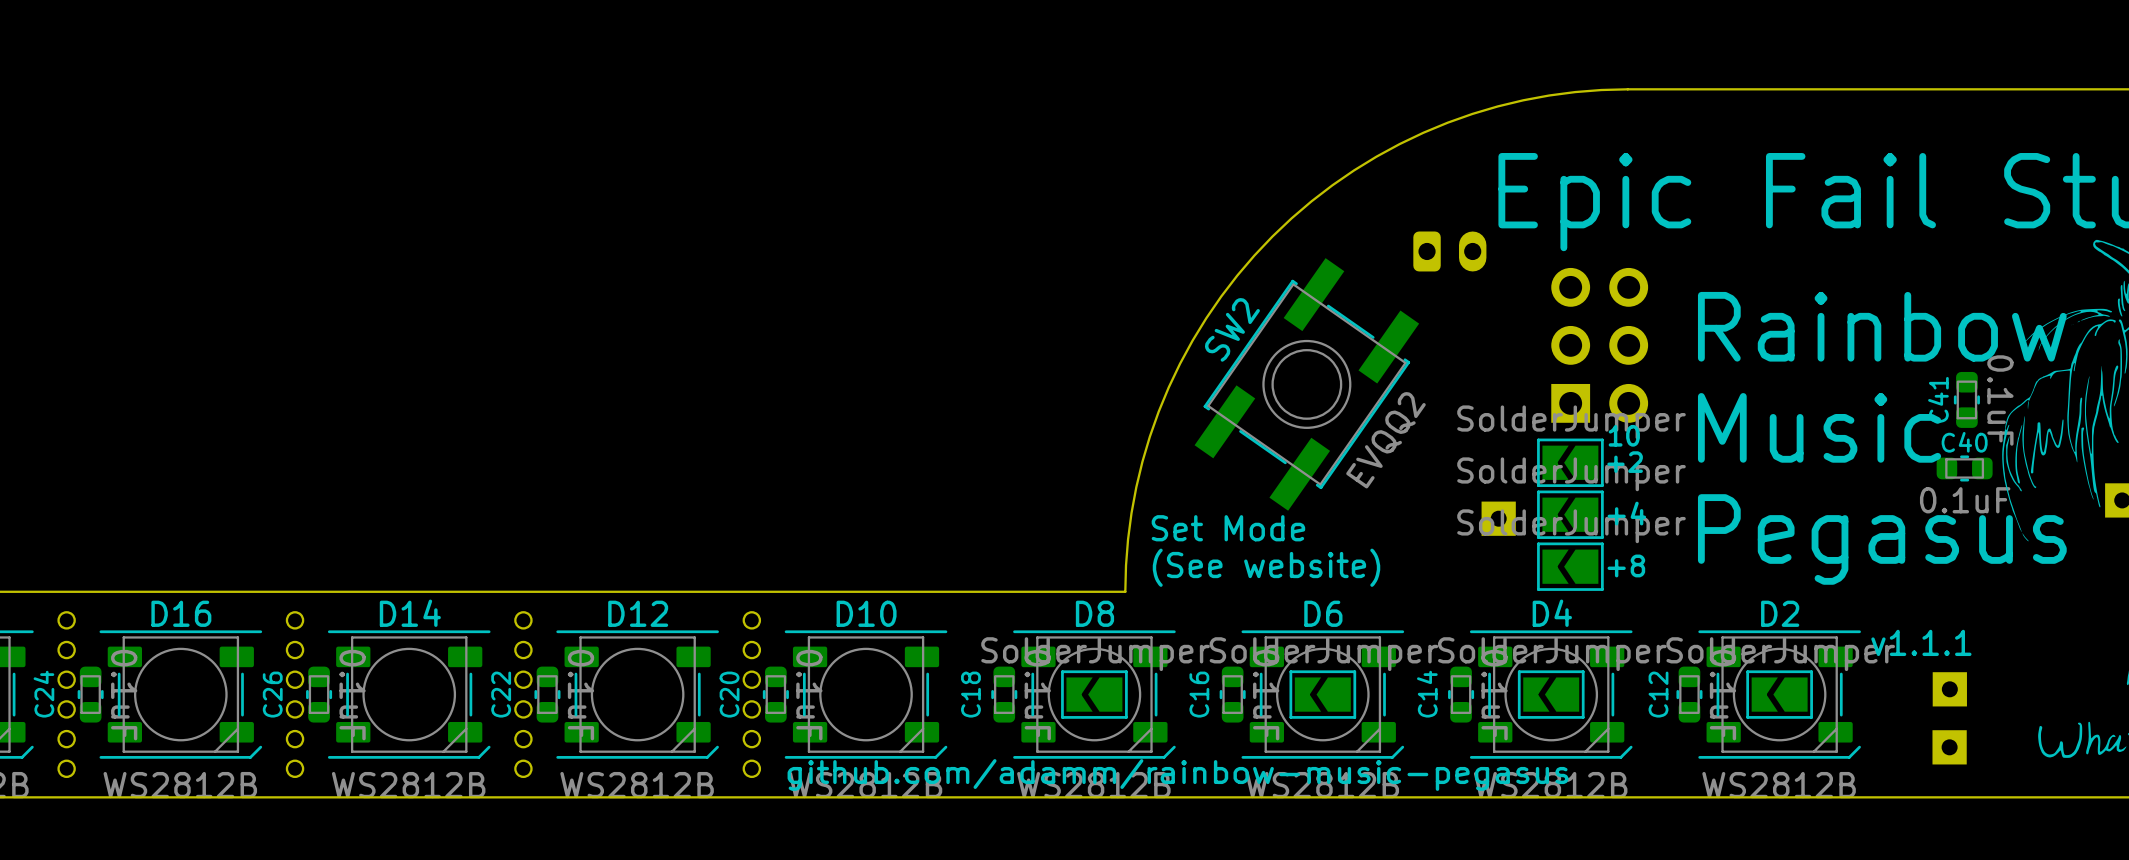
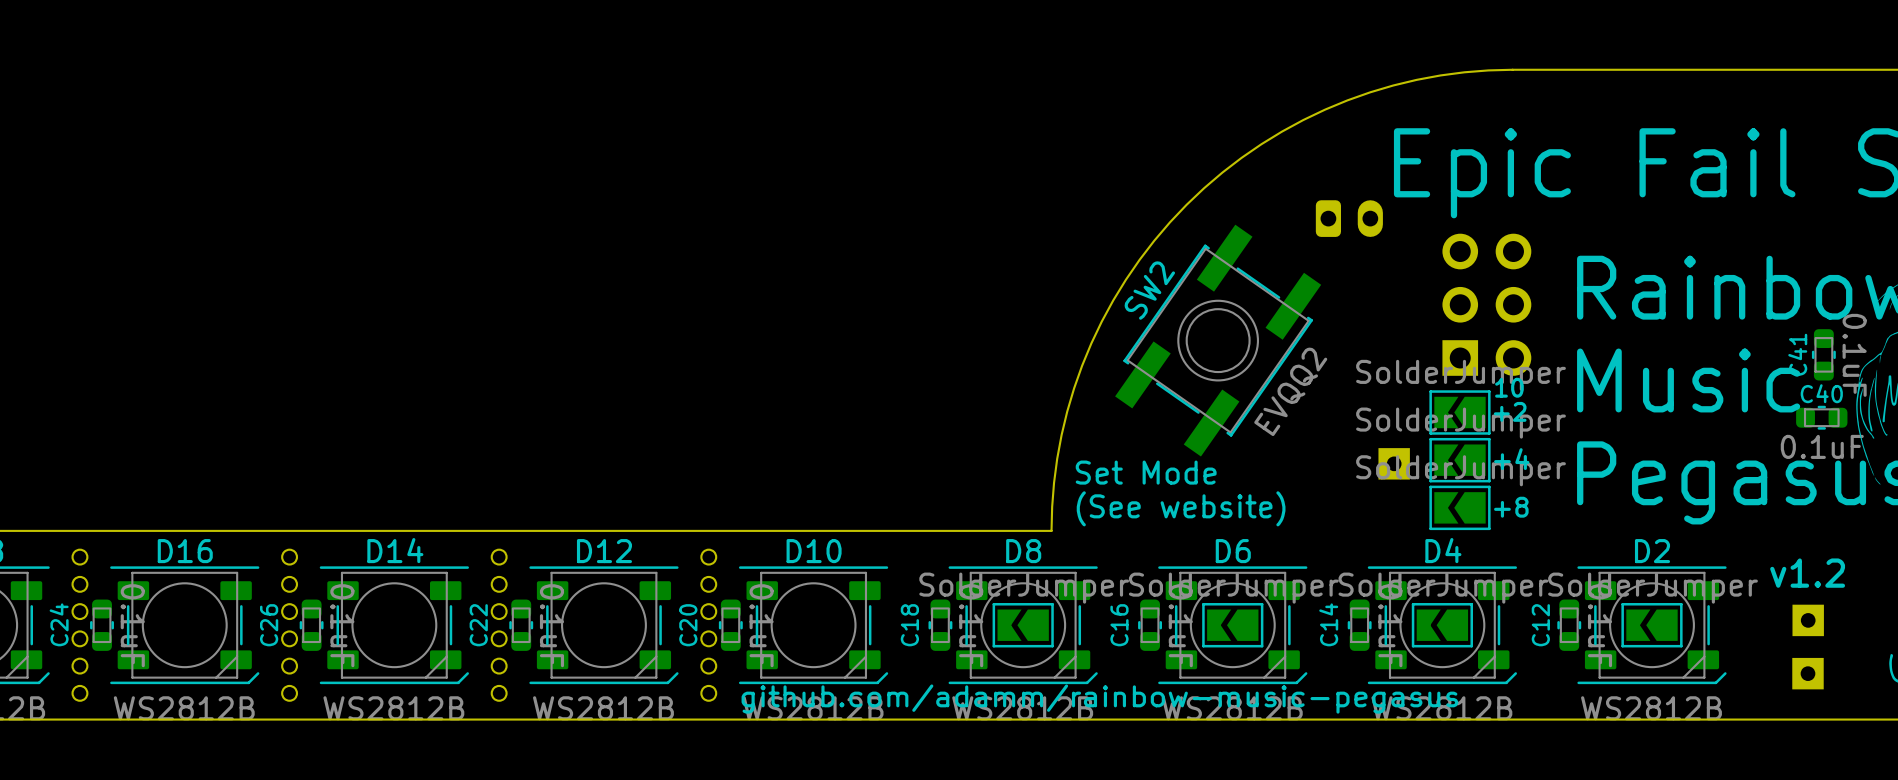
text: none -> v1.2 (1807, 573)
text: v1.1.1 (1921, 642) -> none

